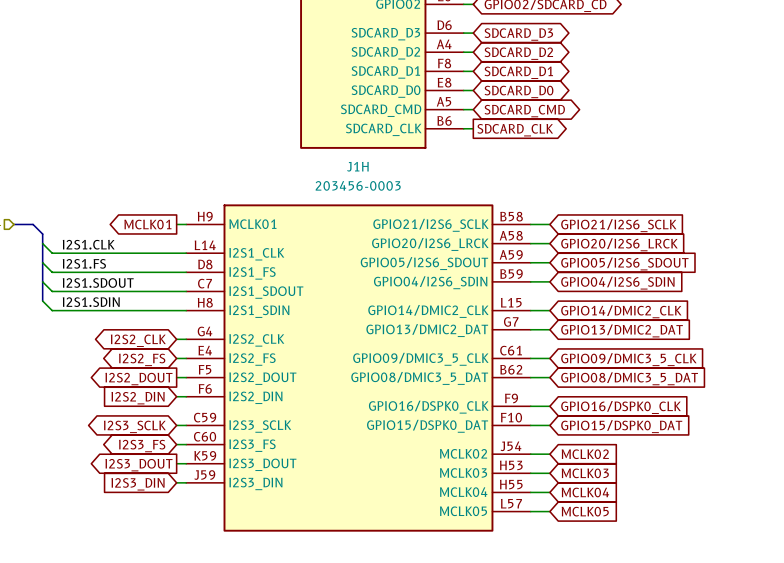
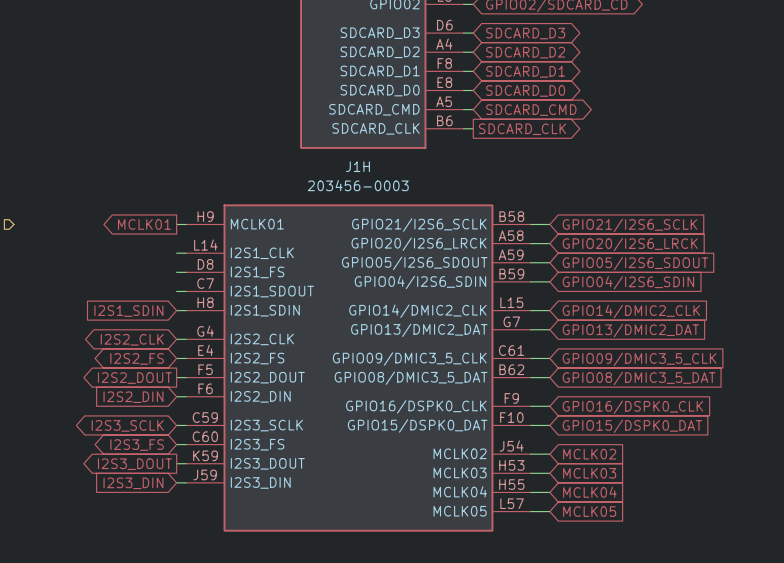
bus: (13, 224) (33, 224) (42, 234) (42, 301) -> none
wire: (42, 243) (52, 253) (176, 253) -> none
label: I2S1.CLK (88, 244) -> none
wire: (42, 262) (52, 272) (176, 272) -> none
label: I2S1.FS (84, 263) -> none
wire: (42, 281) (52, 291) (176, 291) -> none
label: I2S1.SDOUT (98, 282) -> none
wire: (42, 301) (52, 310) (176, 310) -> none
label: I2S1.SDIN (91, 302) -> none
global label: none -> I2S1_SDIN (128, 311)

